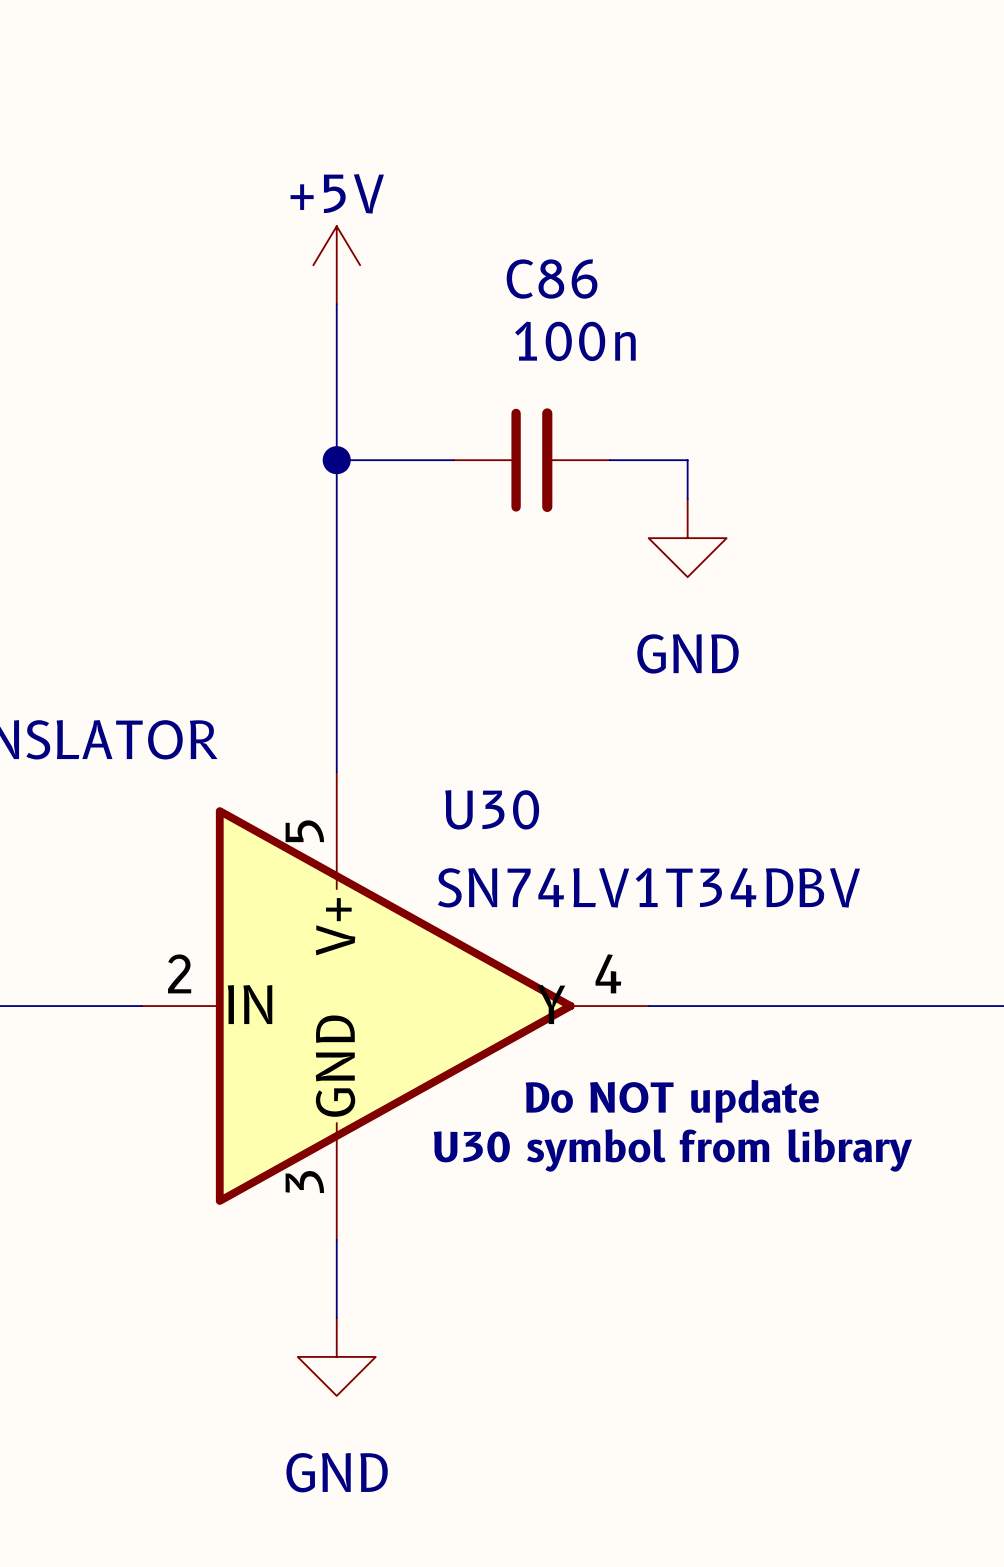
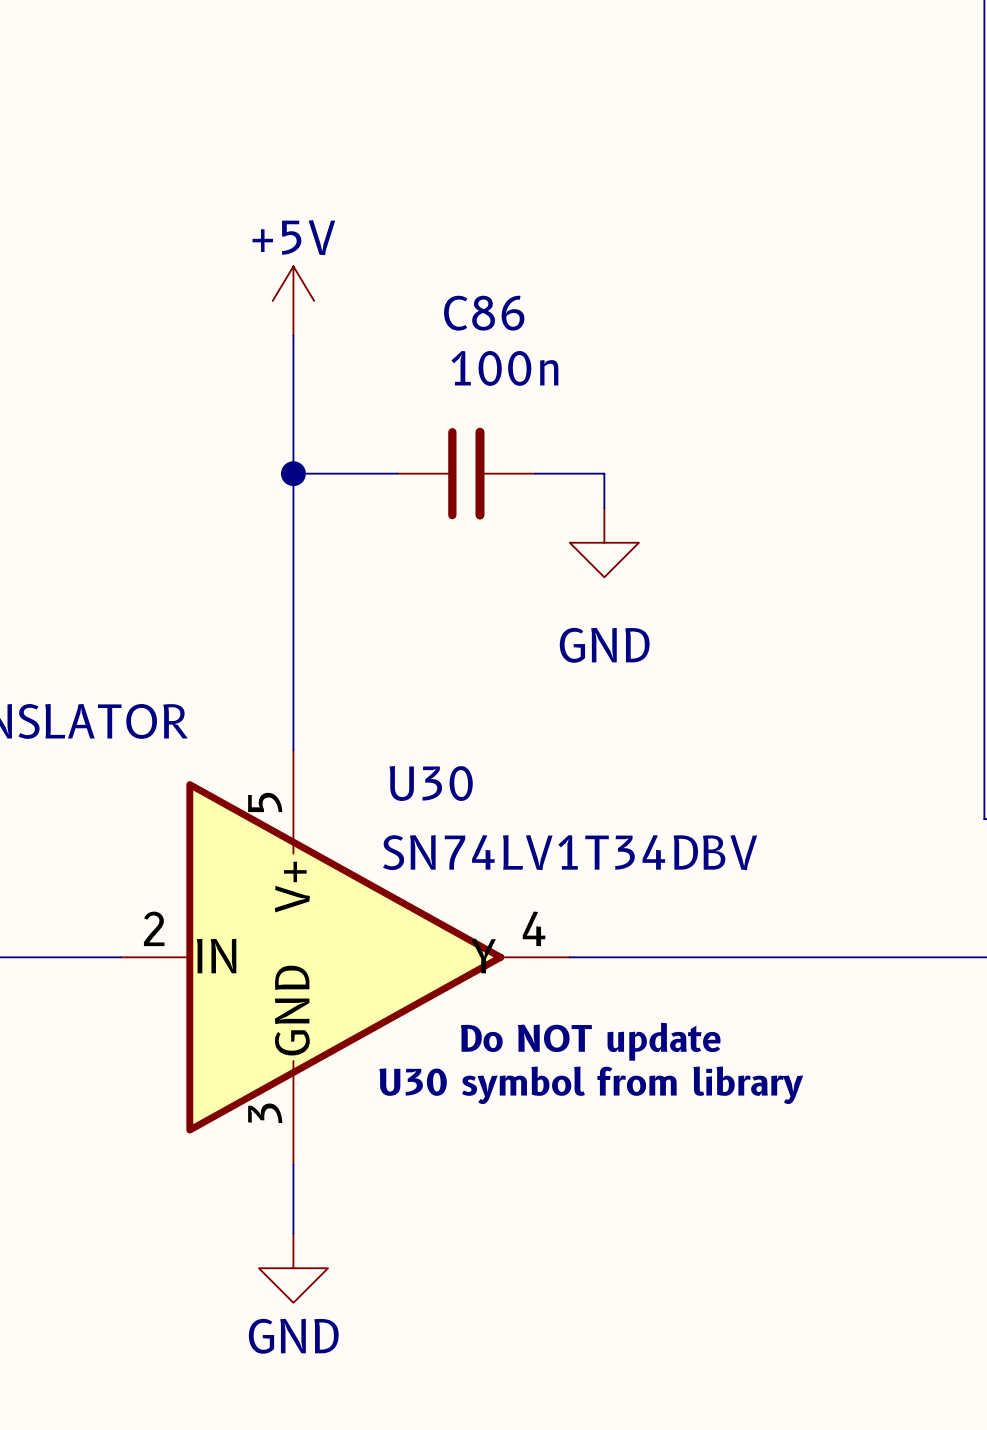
power symbol text position: GND (337, 1472) -> GND (293, 1336)

